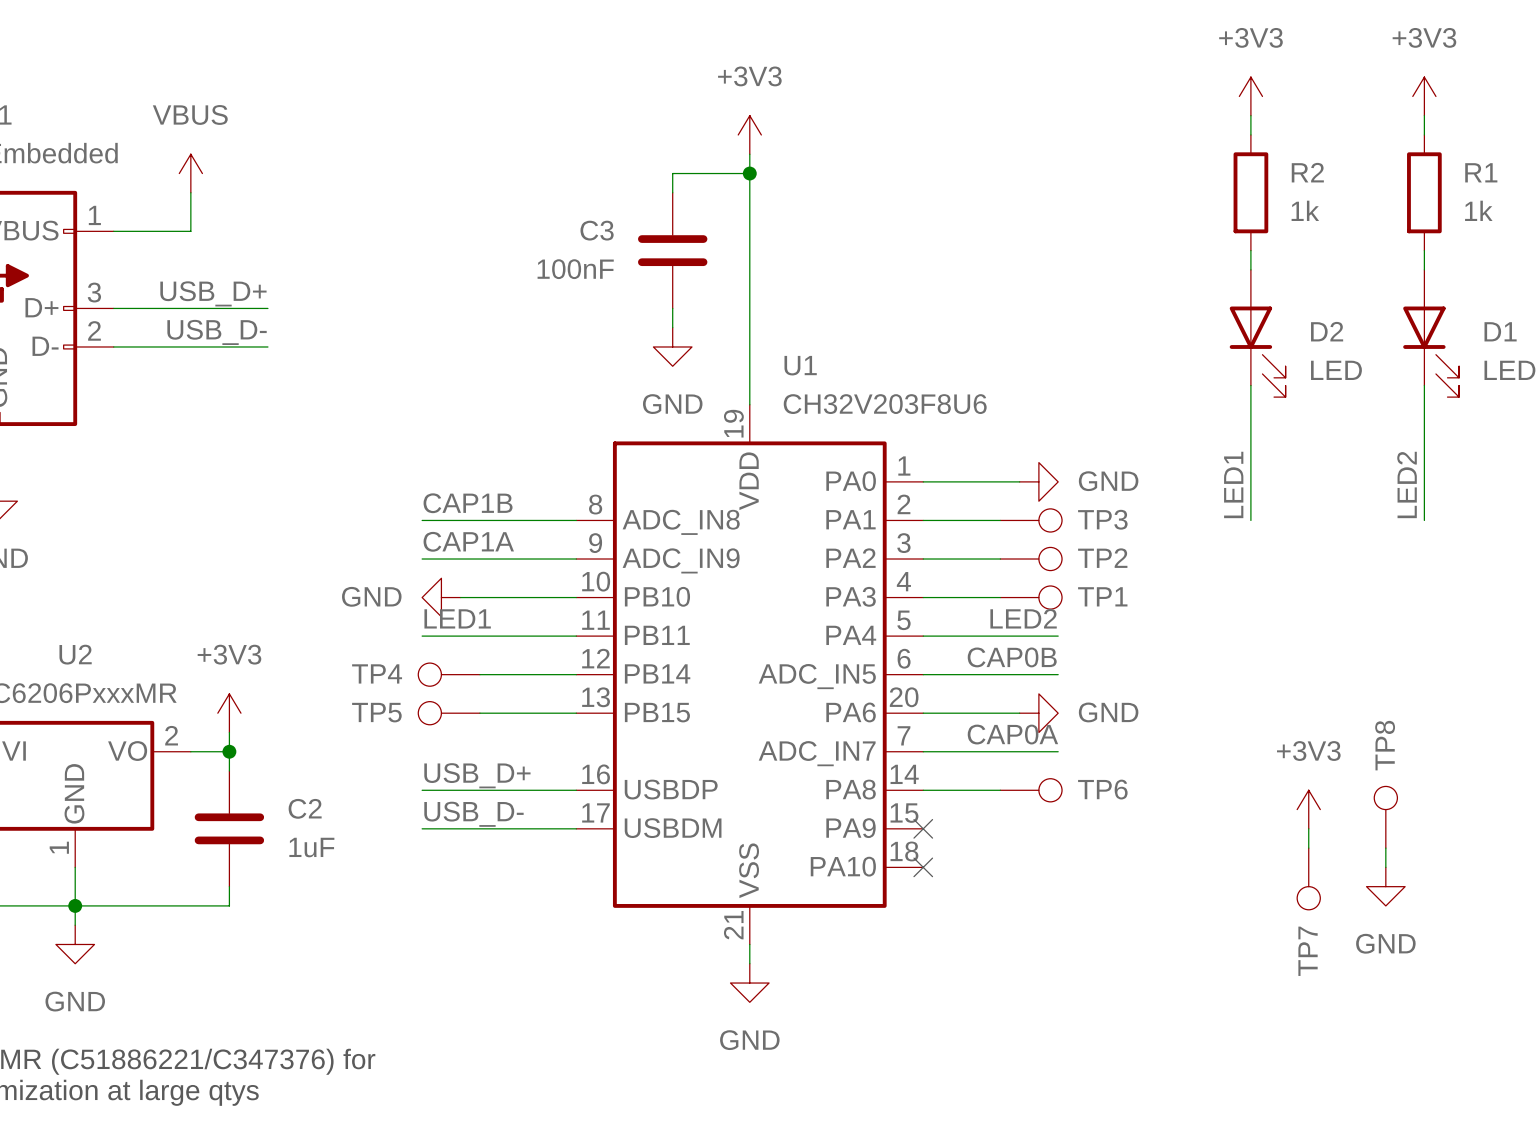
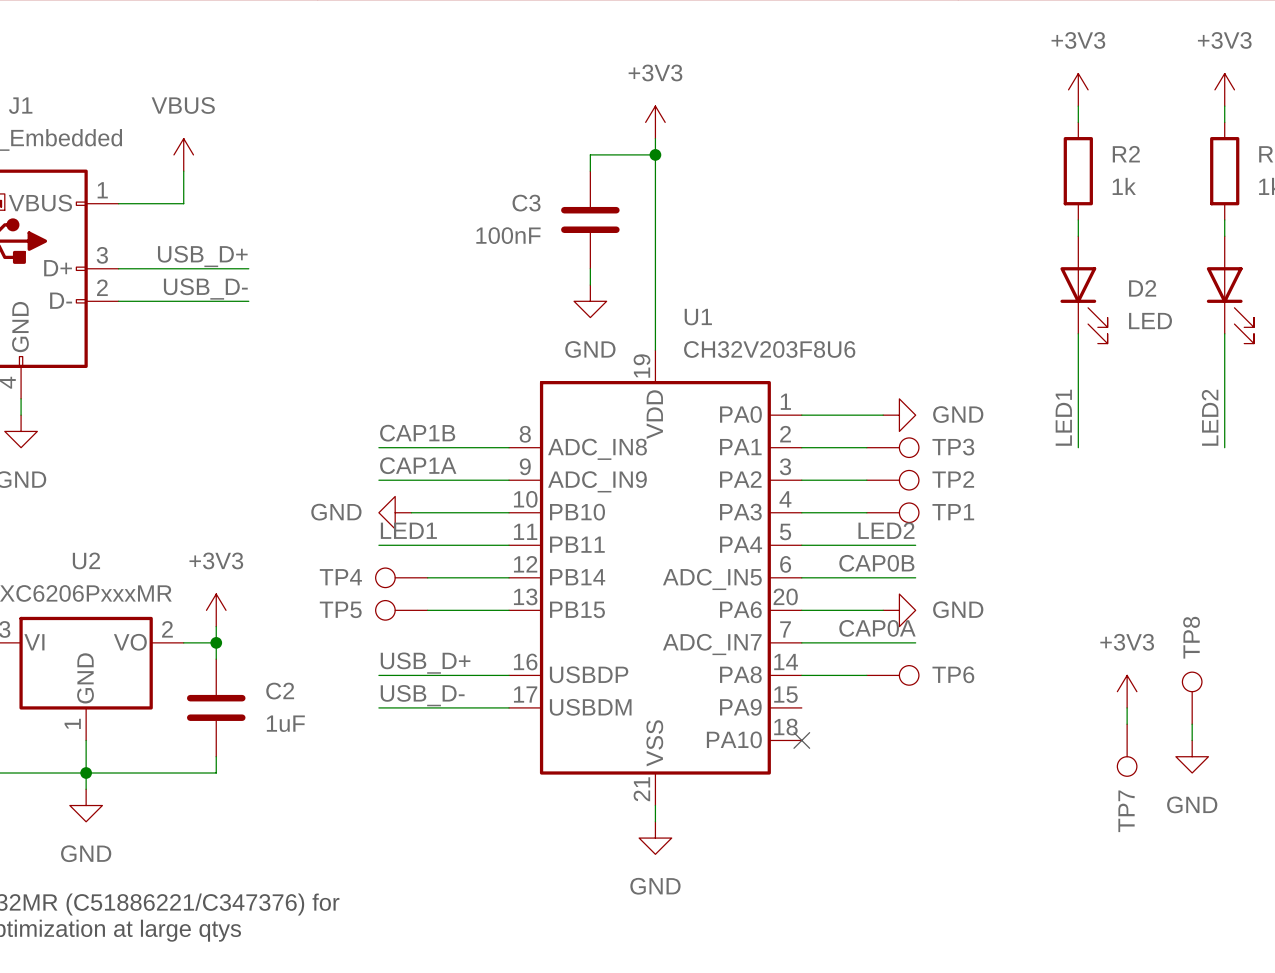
no-connect mark: (923, 828) -> none

